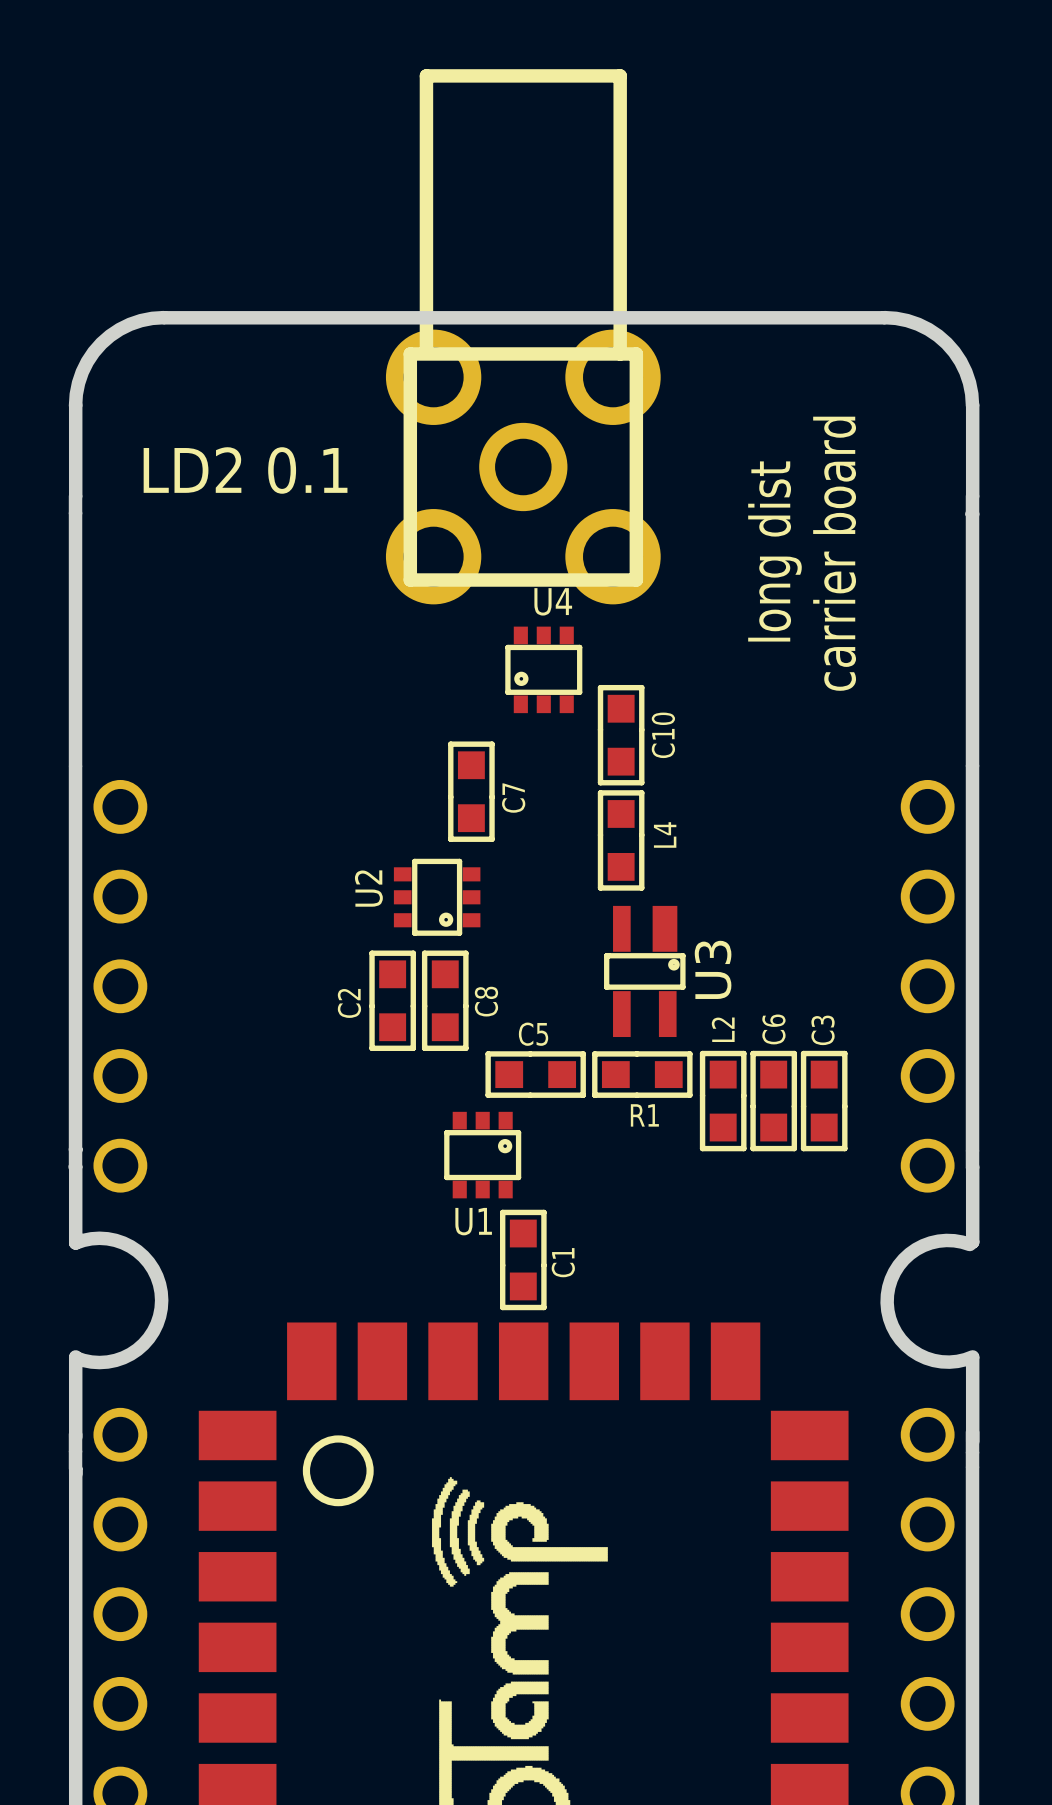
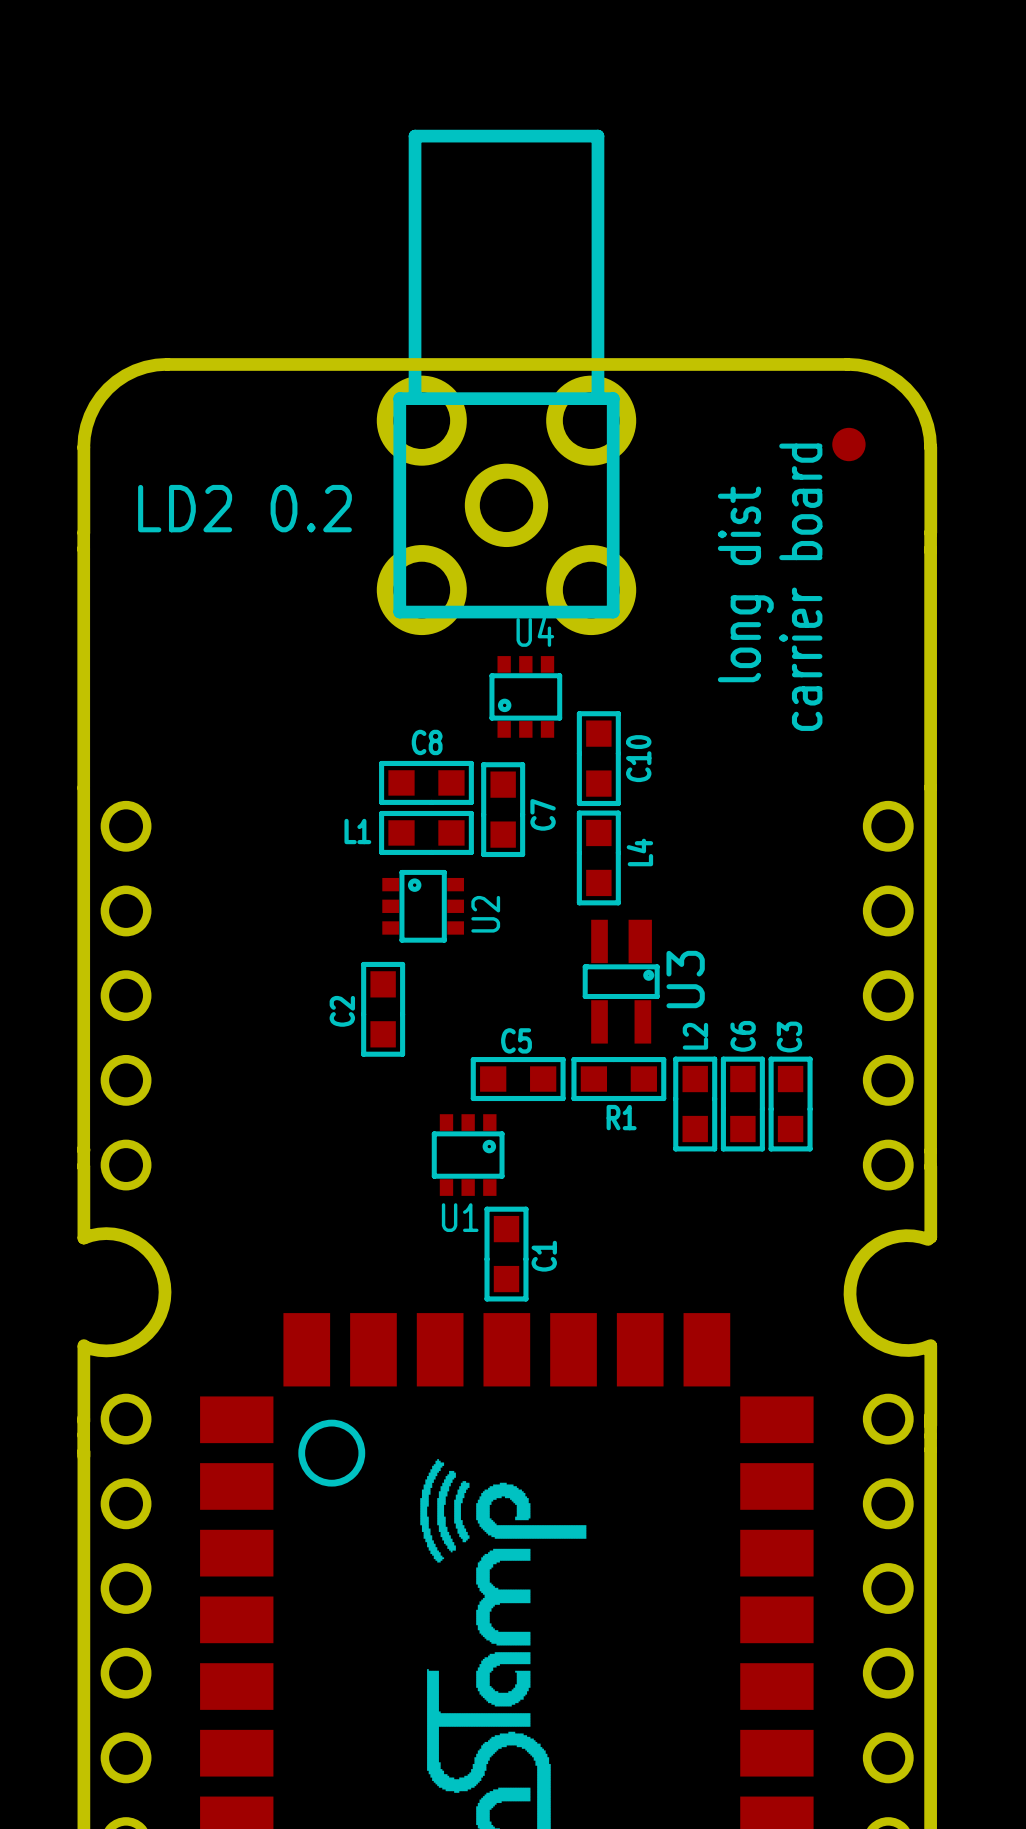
part: none -> (848, 444)
text: LD2 0.1 (245, 470) -> LD2 0.2 (244, 508)
C7 position: (471, 791) -> (503, 809)
L1: none -> (426, 832)
U2 rotation: 0° (437, 897) -> 180° (423, 906)
C8 rotation: 0° (445, 1000) -> 90° counterclockwise (426, 782)
C8 position: (445, 1000) -> (426, 782)

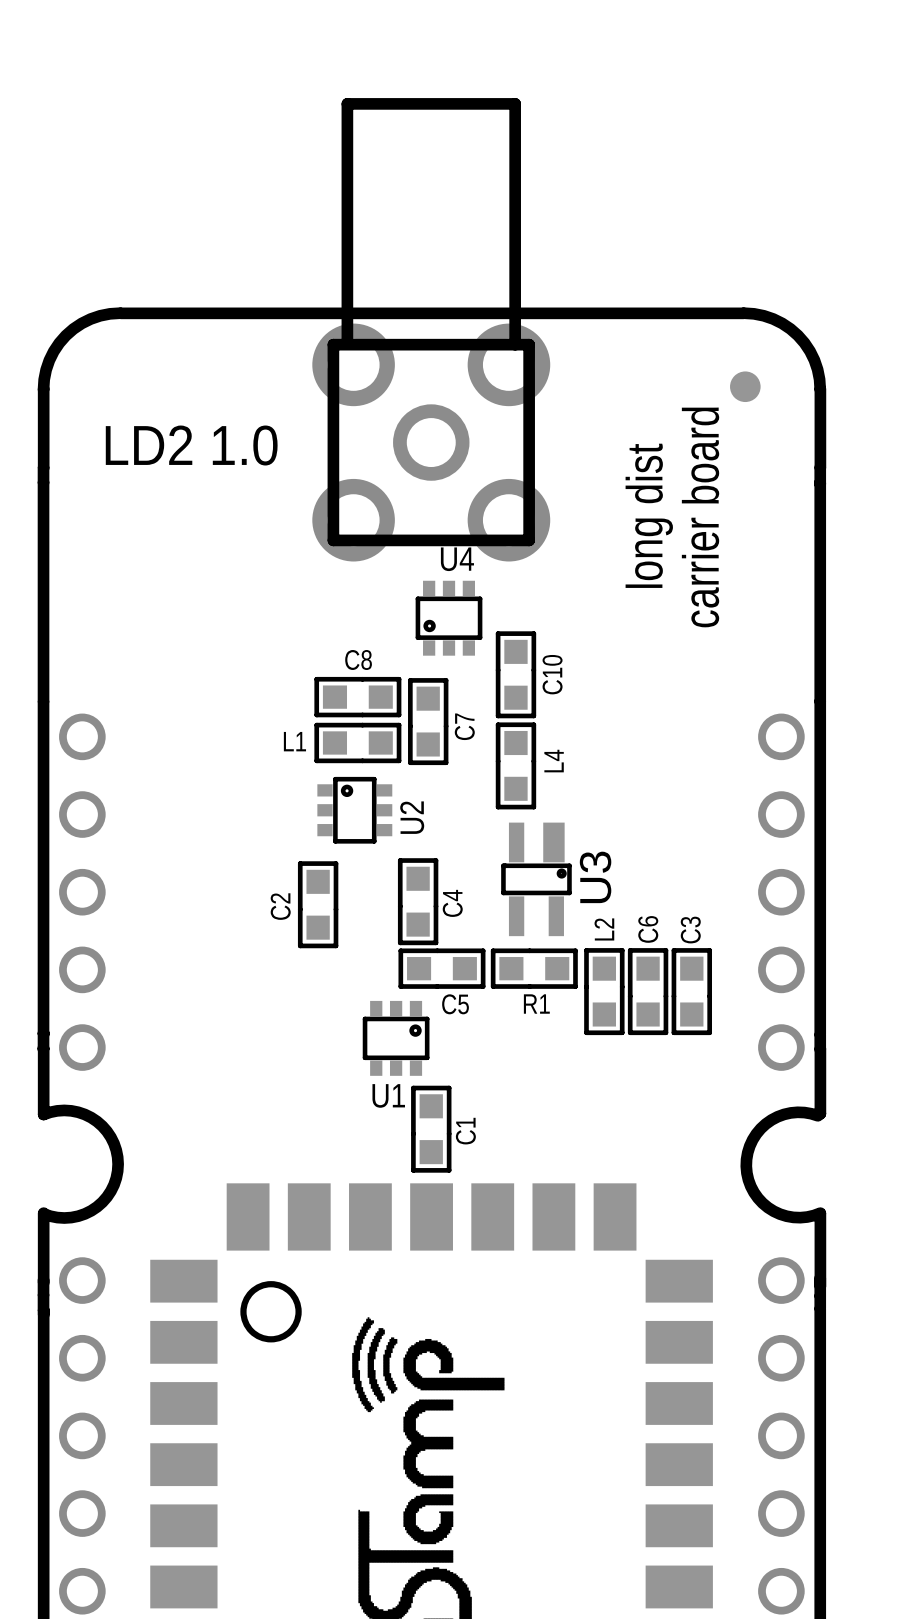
text: LD2 0.2 (244, 508) -> LD2 1.0 (191, 445)
C4: none -> (418, 901)
C5 name position: C5 (516, 1040) -> C5 (455, 1004)

